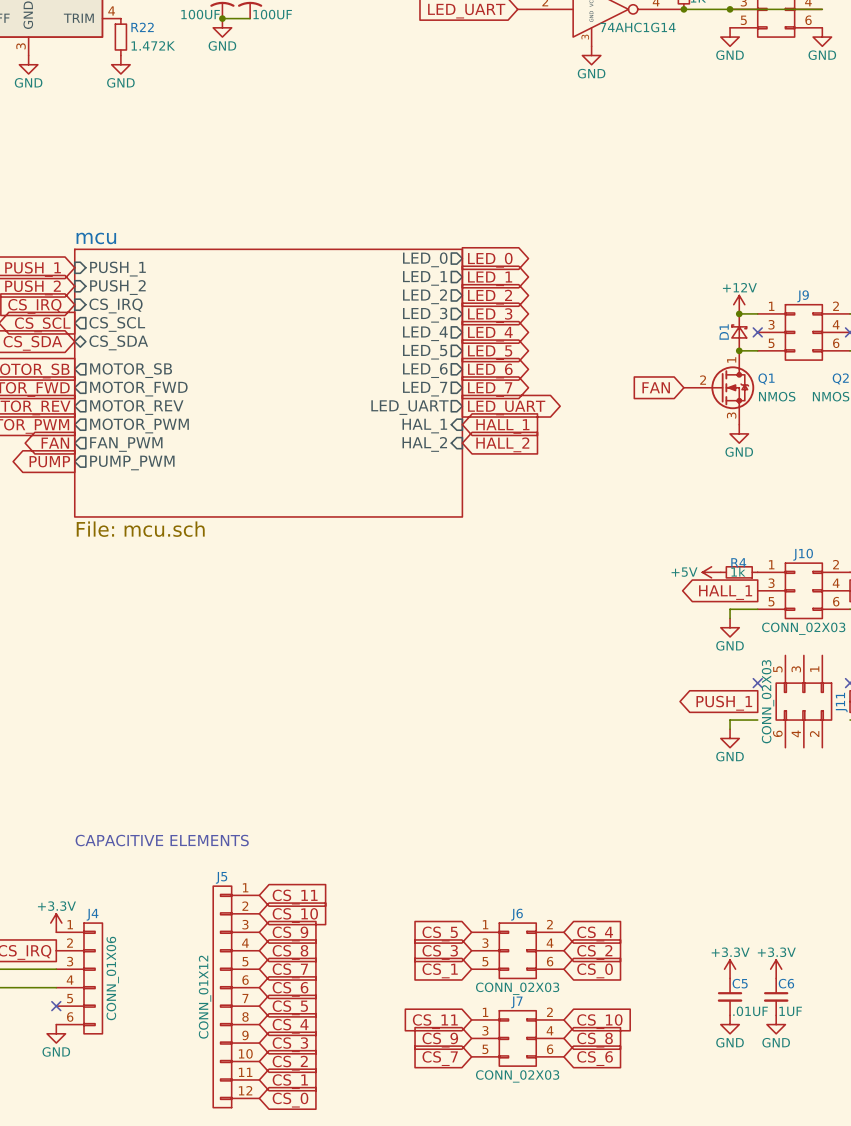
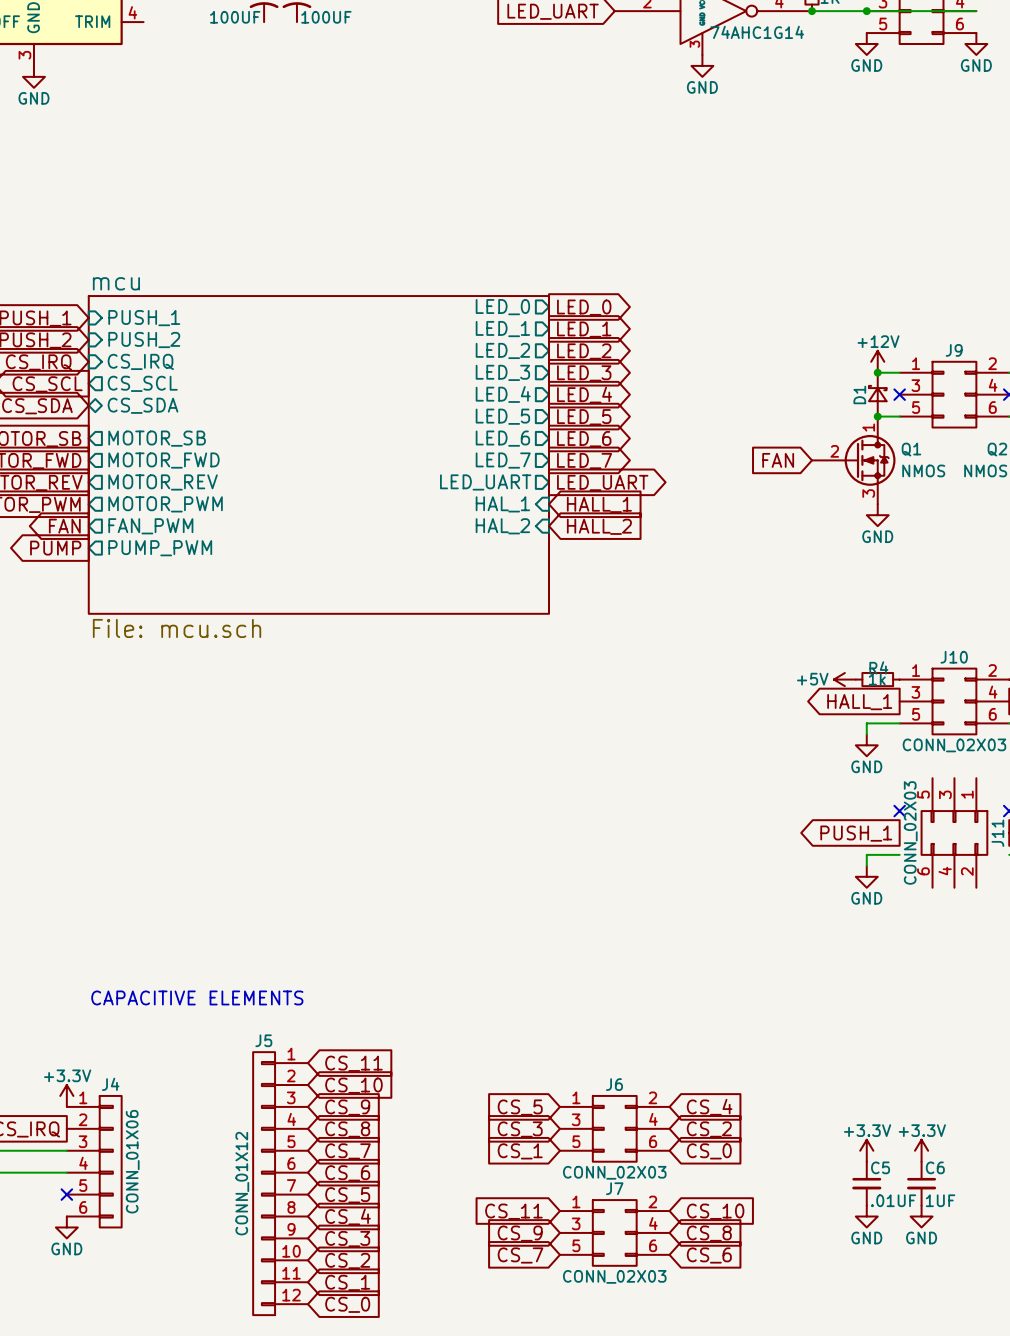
wire: (222, 18) (250, 18) -> none
junction: (222, 18) -> none
power symbol: GND (222, 27) -> none
R22: 1.472K (120, 37) -> none
power symbol: GND (120, 64) -> none

